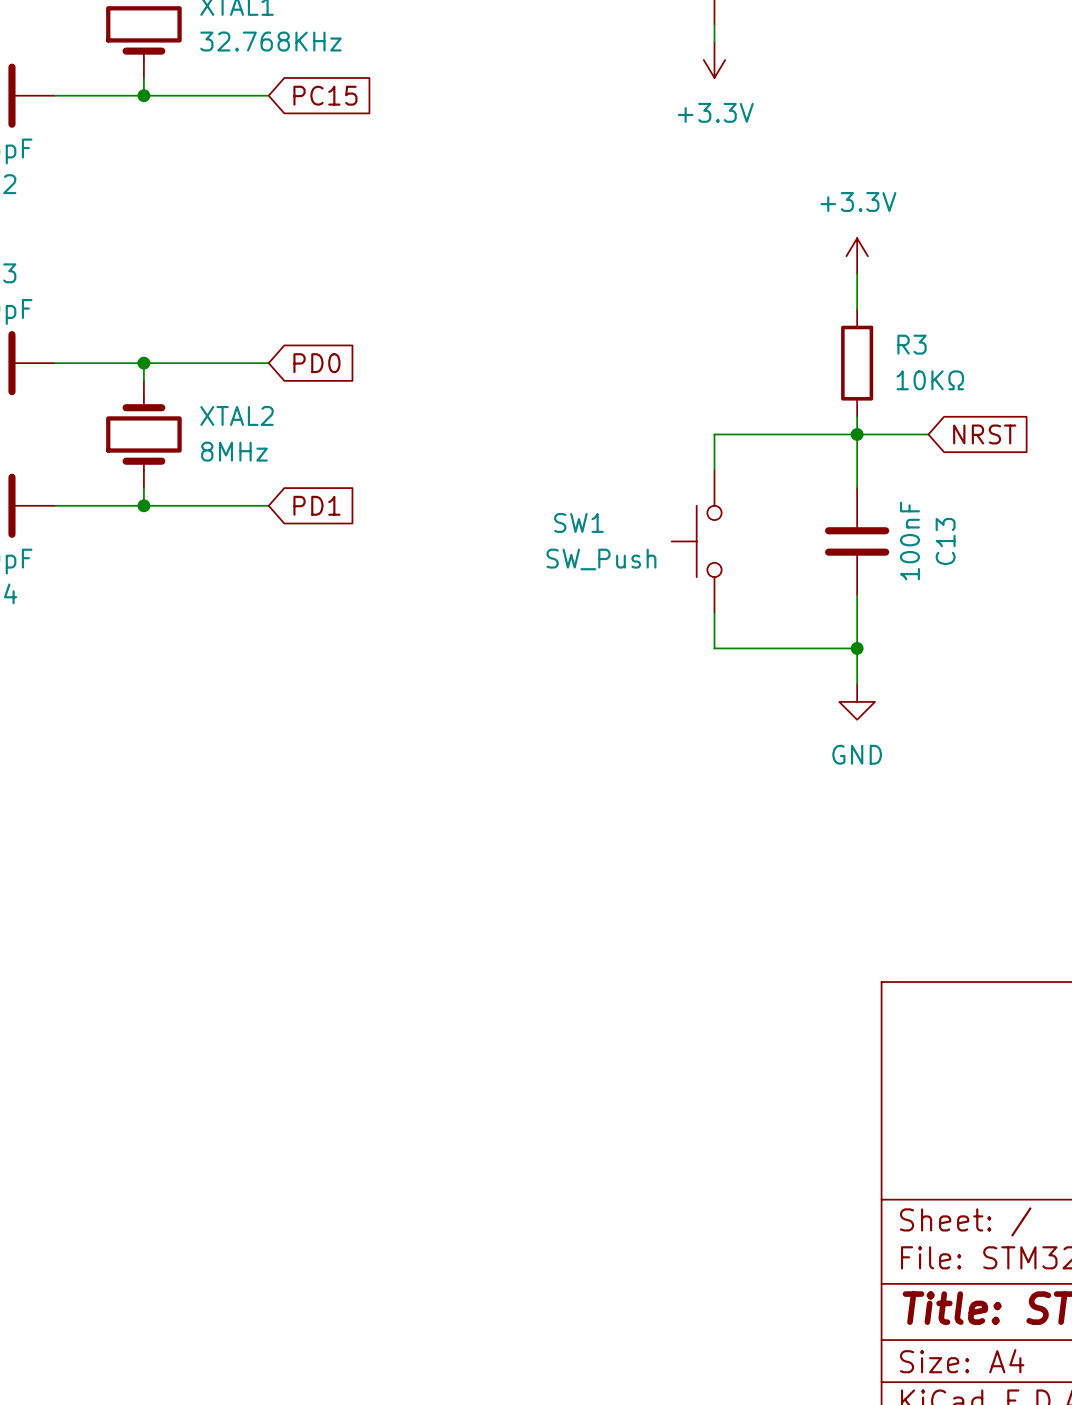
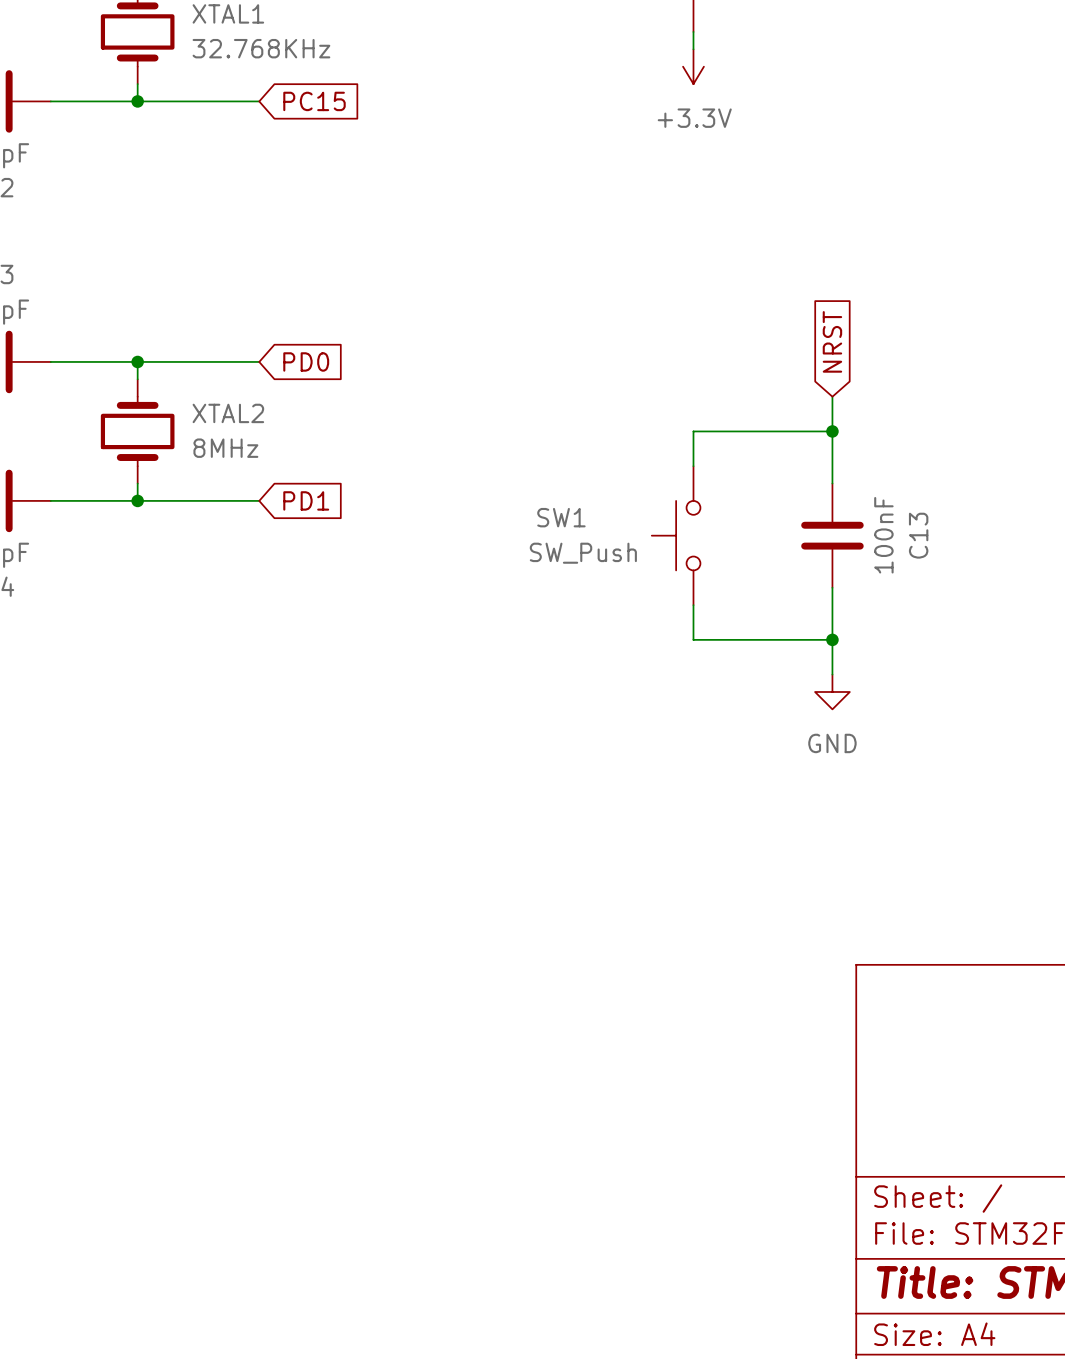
power symbol: +3.3V (857, 256) -> none
wire: (857, 274) (857, 309) -> none
R3: 10KΩ (857, 363) -> none
wire: (857, 434) (928, 434) -> none
global label rotation: 0° (984, 434) -> 90° counterclockwise (832, 341)
global label position: NRST (984, 434) -> NRST (832, 341)

